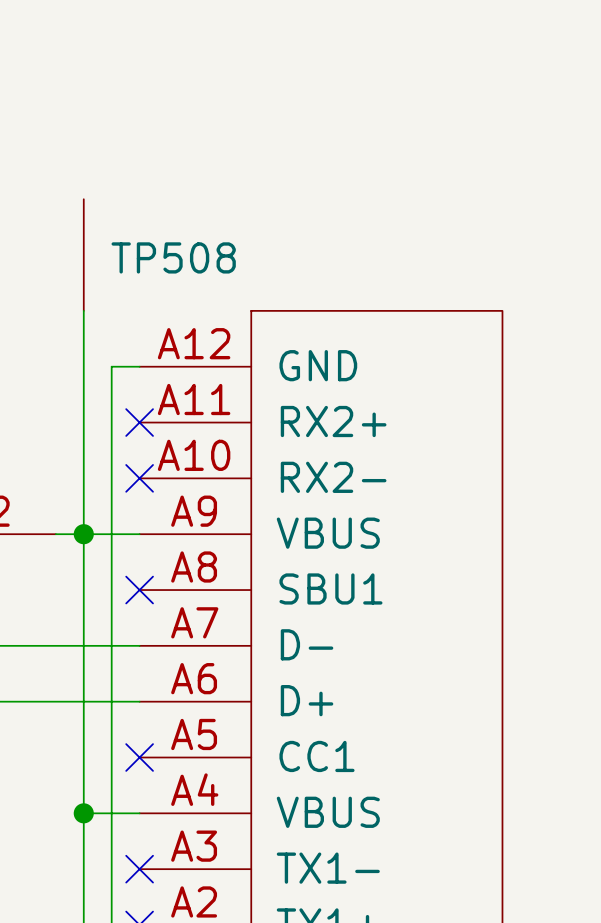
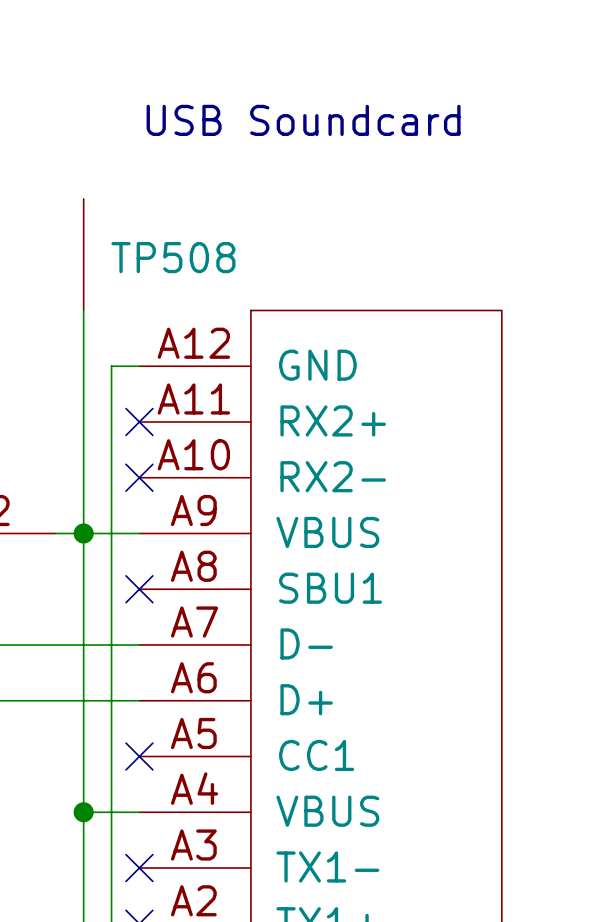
text: none -> USB Soundcard (303, 120)

